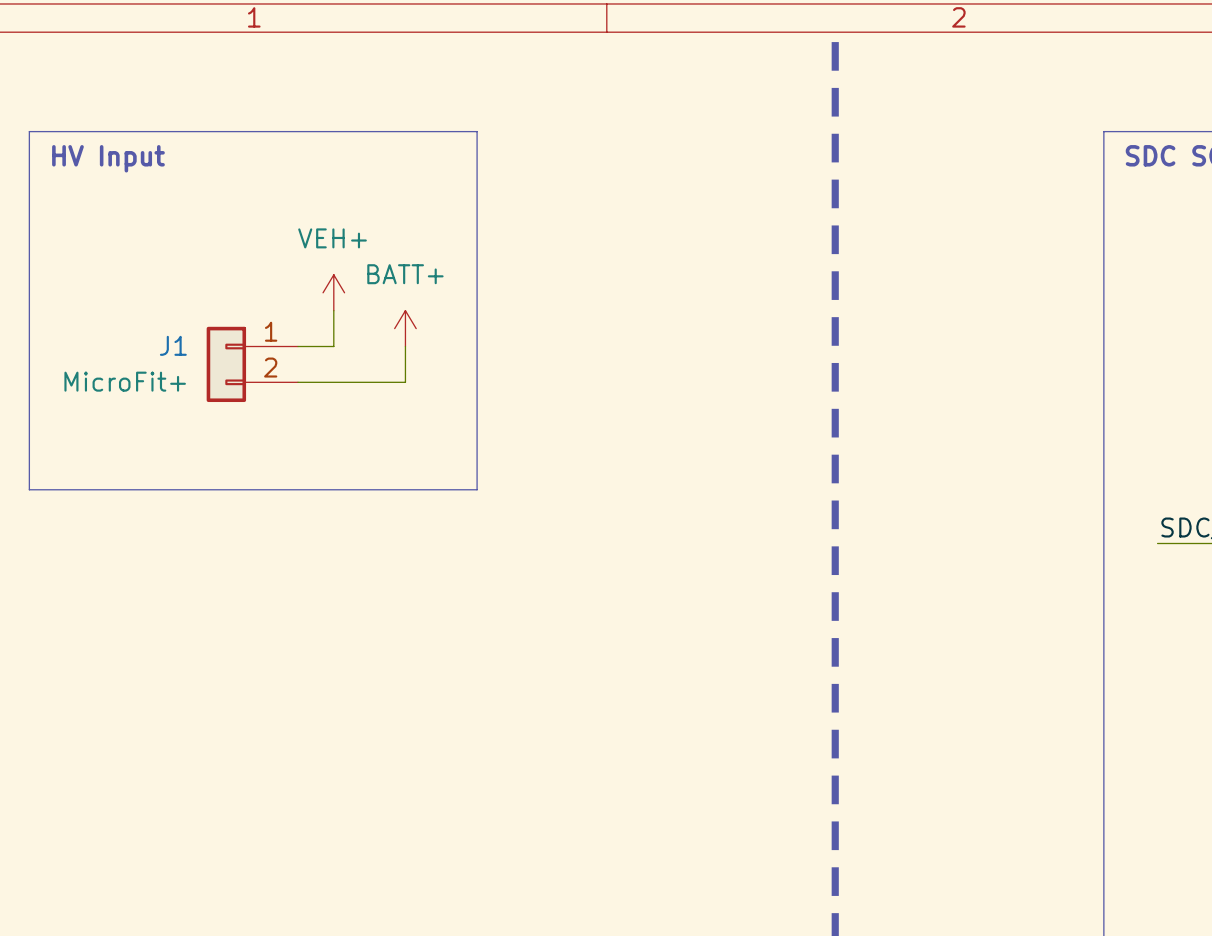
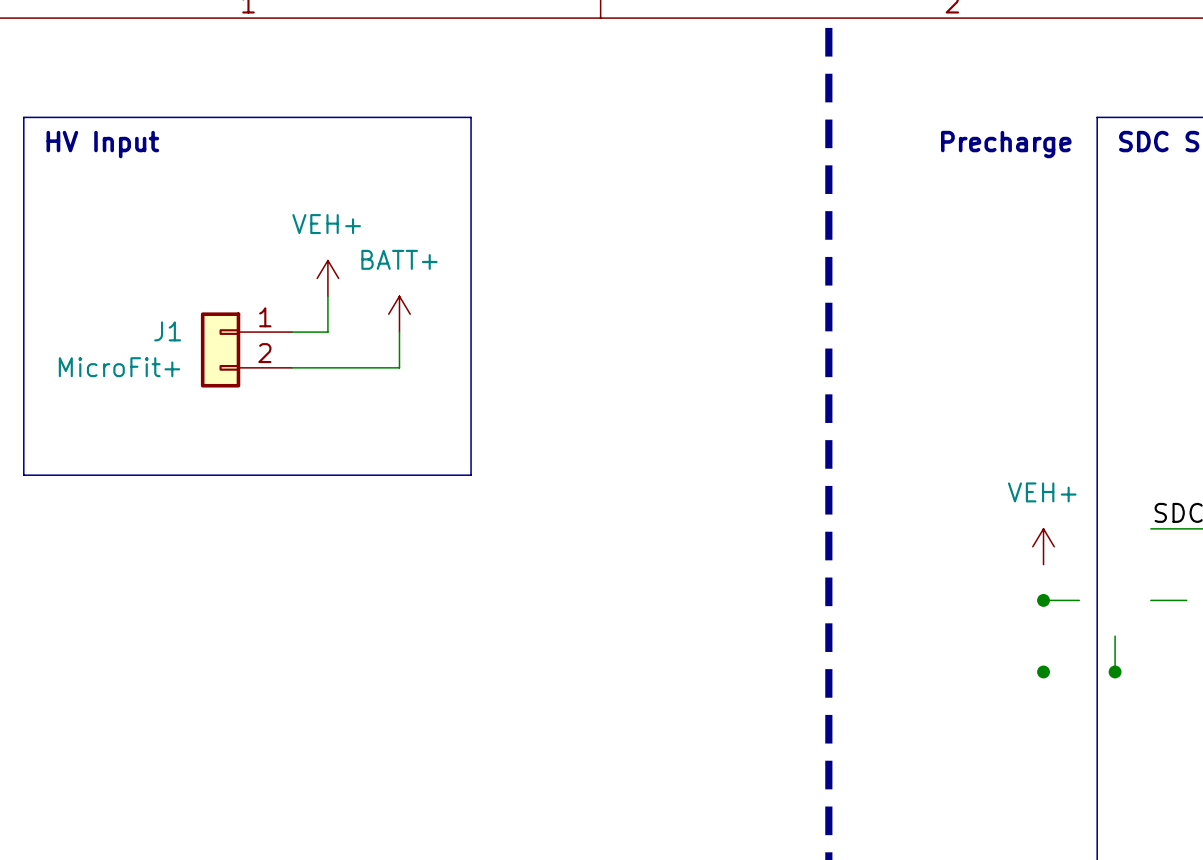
text: none -> Precharge (1006, 144)
power symbol: none -> VEH+ (1043, 546)
wire: none -> (1043, 600) (1079, 600)
junction: none -> (1043, 600)
wire: none -> (1150, 600) (1186, 600)
wire: none -> (1115, 636) (1115, 671)
junction: none -> (1043, 671)
junction: none -> (1115, 671)

